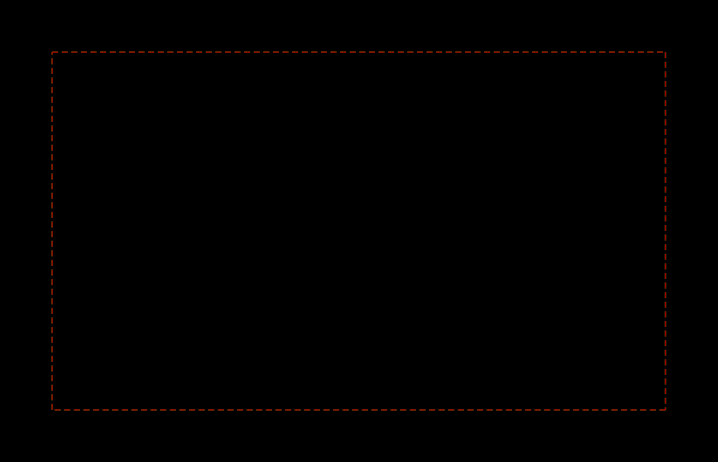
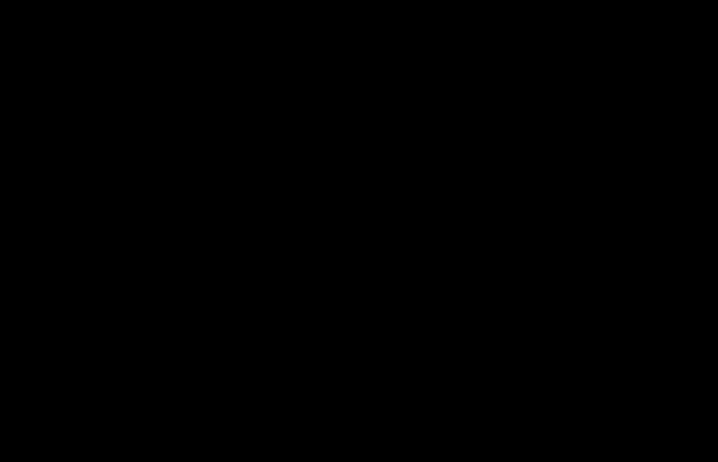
top zone outline: (52, 52) (52, 409) (665, 409) (665, 52) (52, 52) -> none

